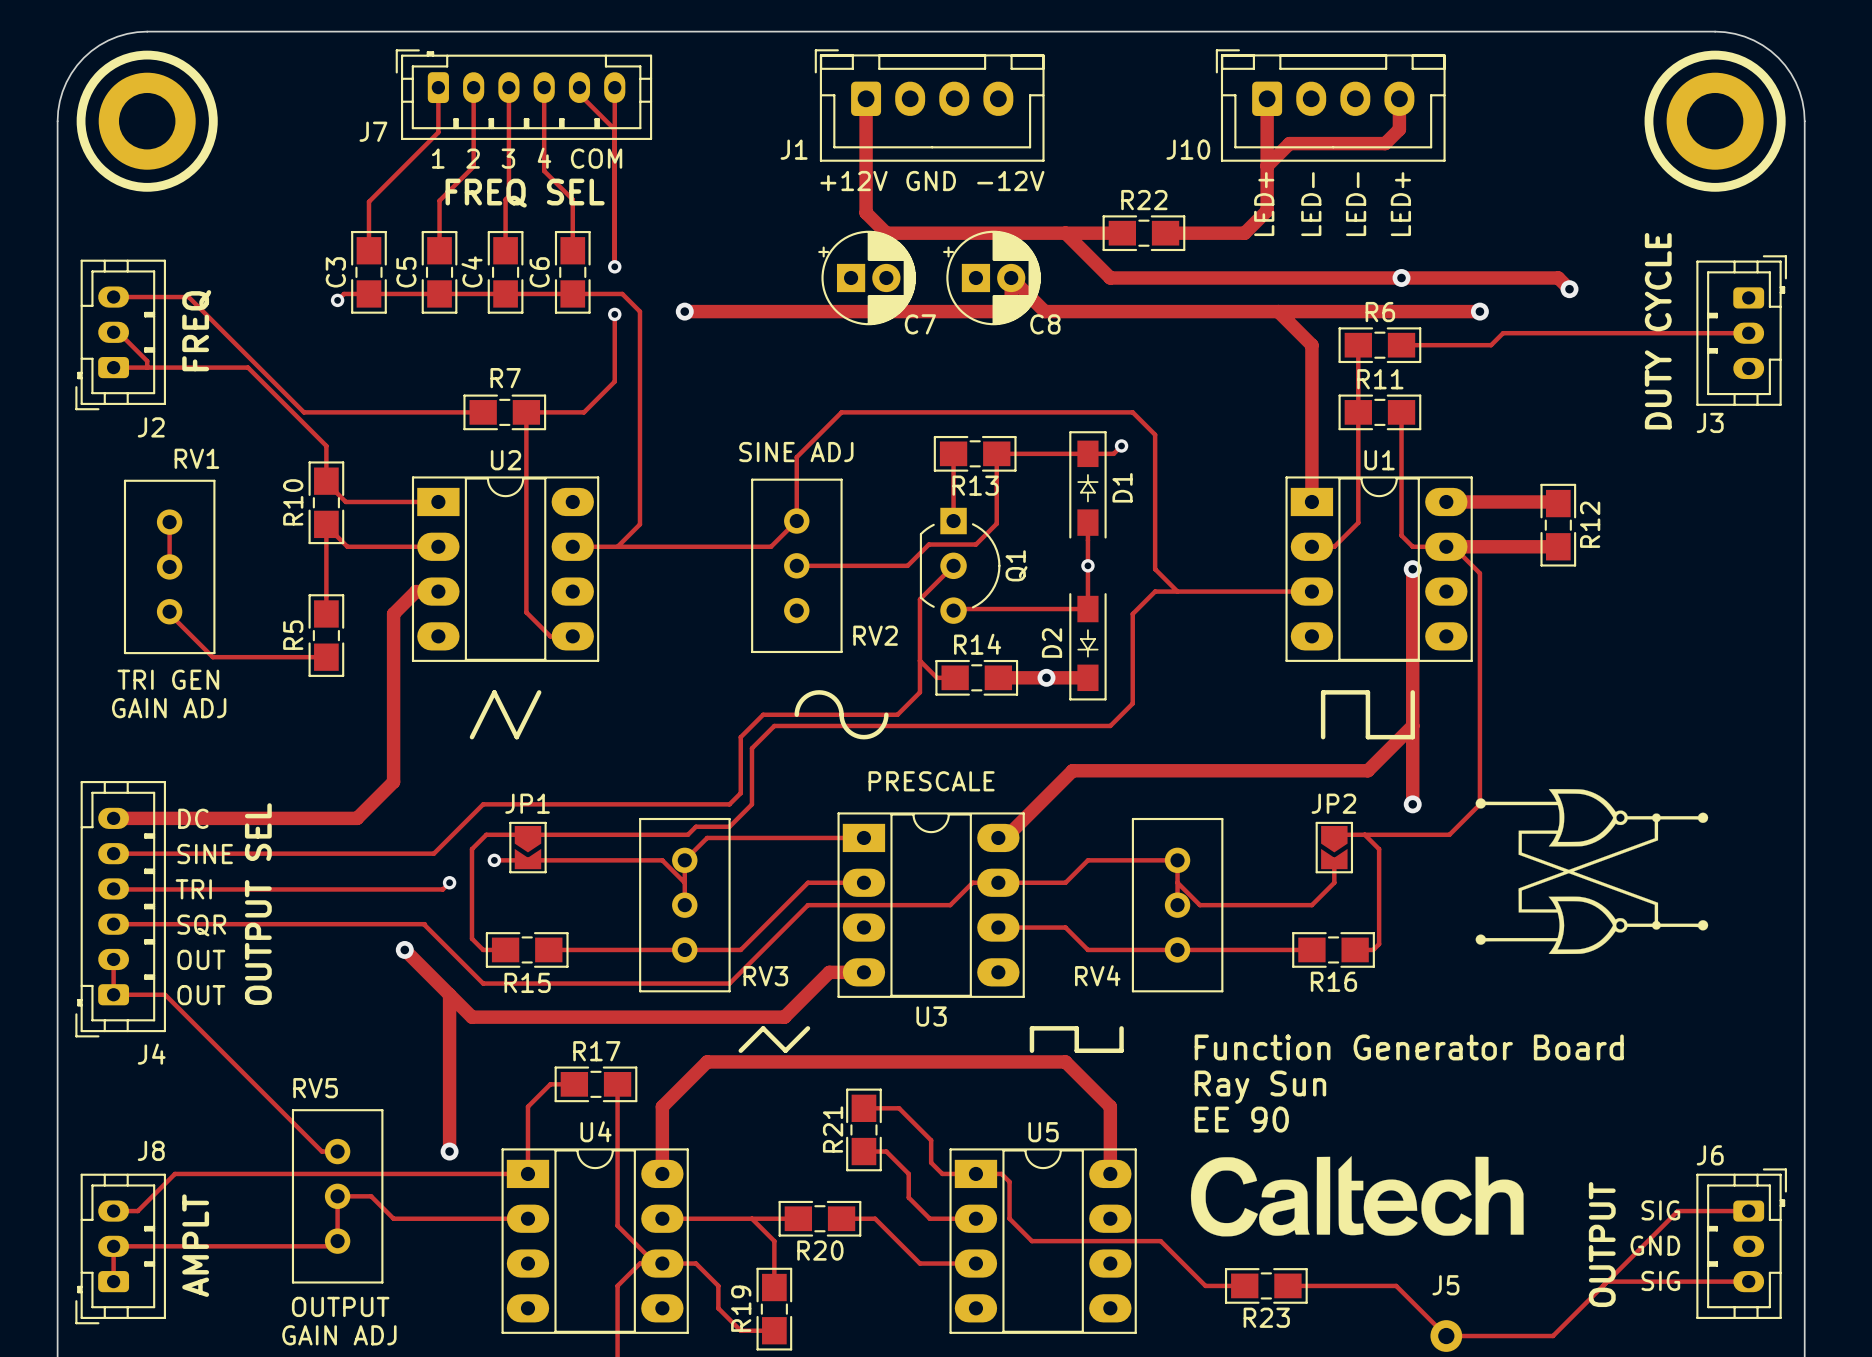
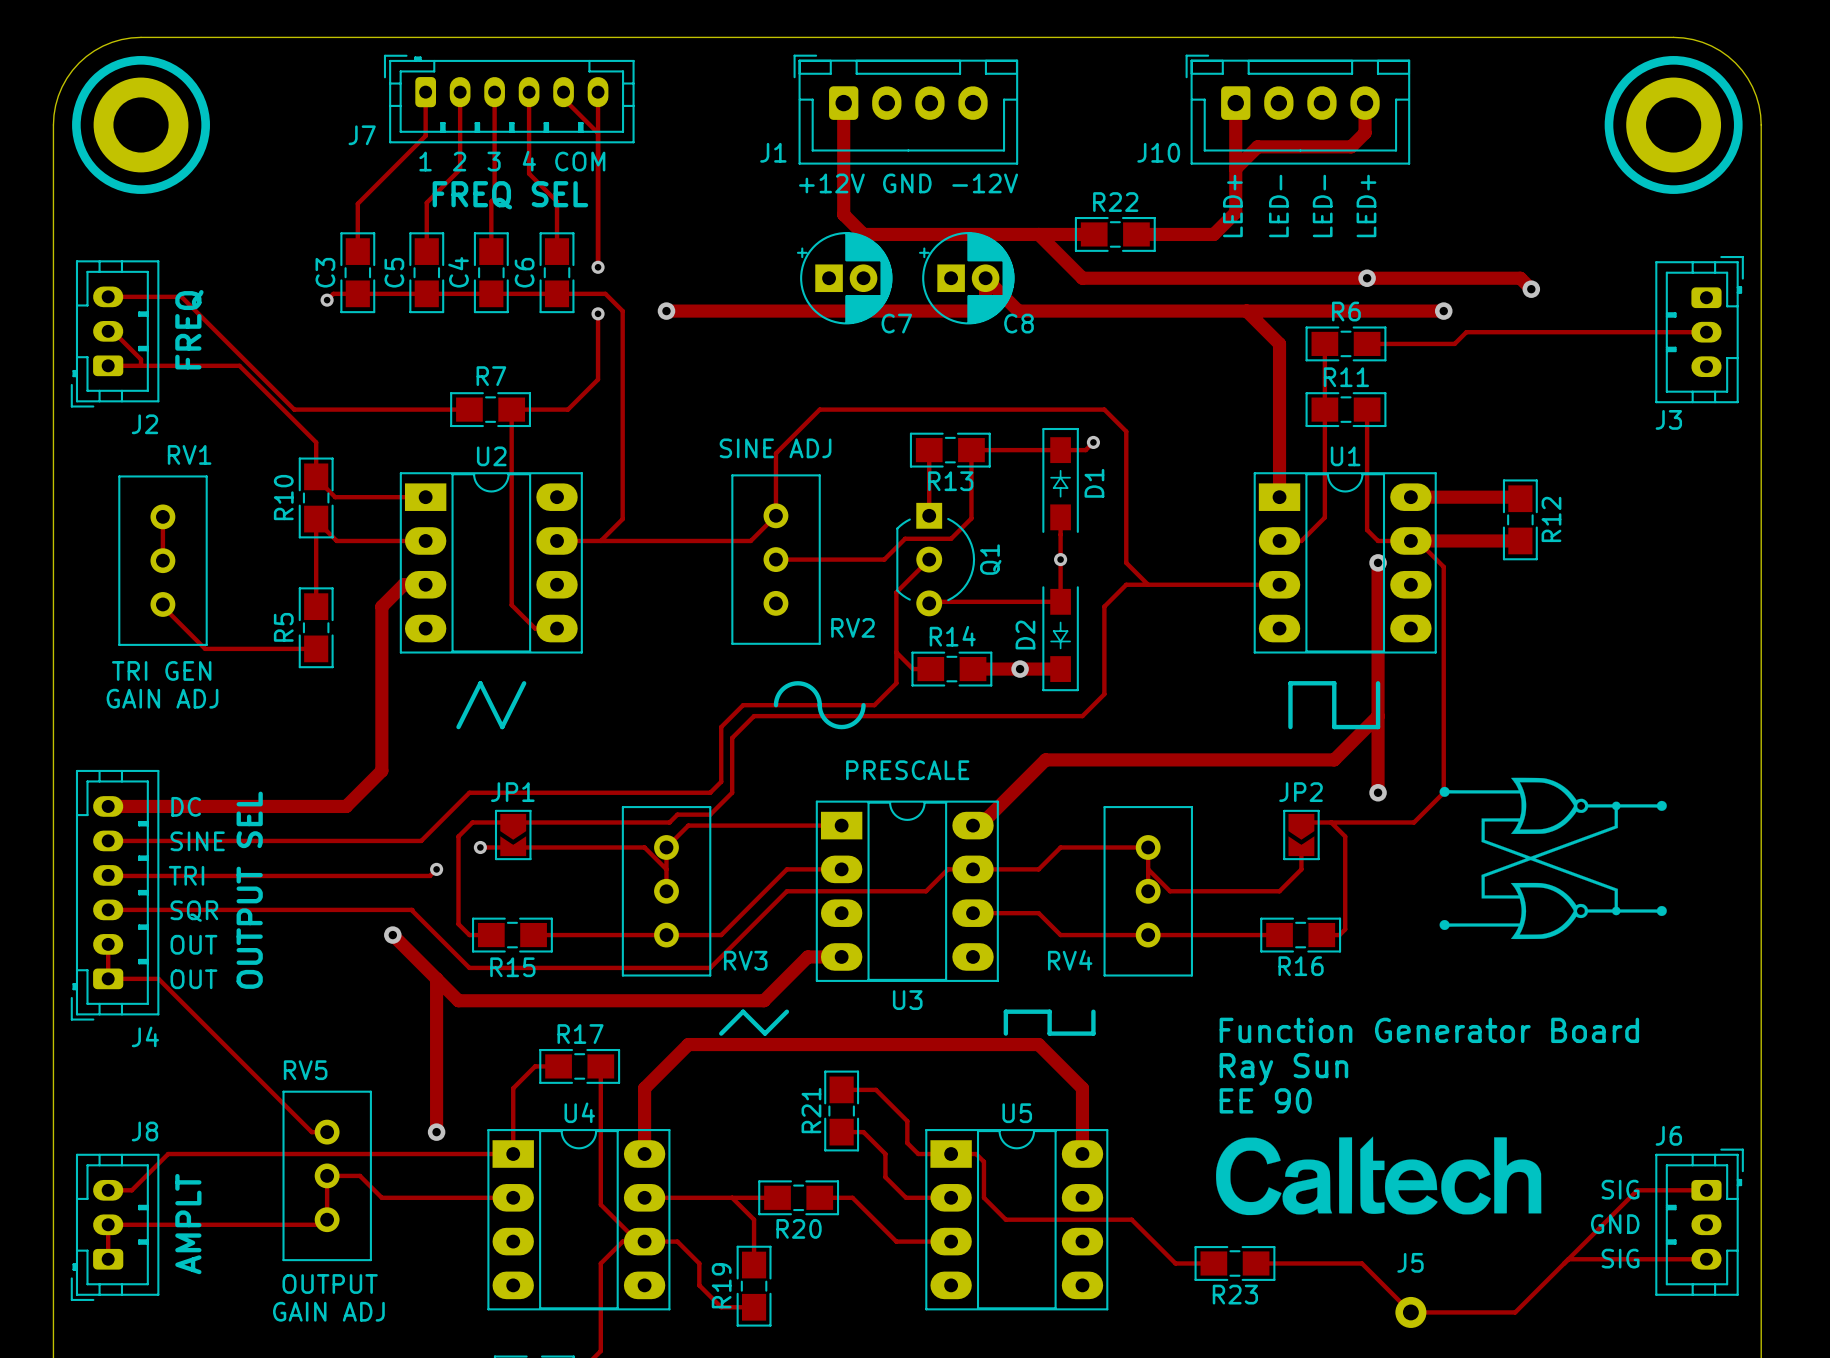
text: DUTY CYCLE (1658, 331) -> none
text position: Function Generator Board (1409, 1047) -> Function Generator Board (1429, 1030)
text position: Ray Sun (1260, 1087) -> Ray Sun (1283, 1069)
text position: EE 90 (1241, 1119) -> EE 90 (1265, 1100)
drawing position: (1357, 1196) -> (1378, 1175)
text: OUTPUT (1602, 1244) -> none

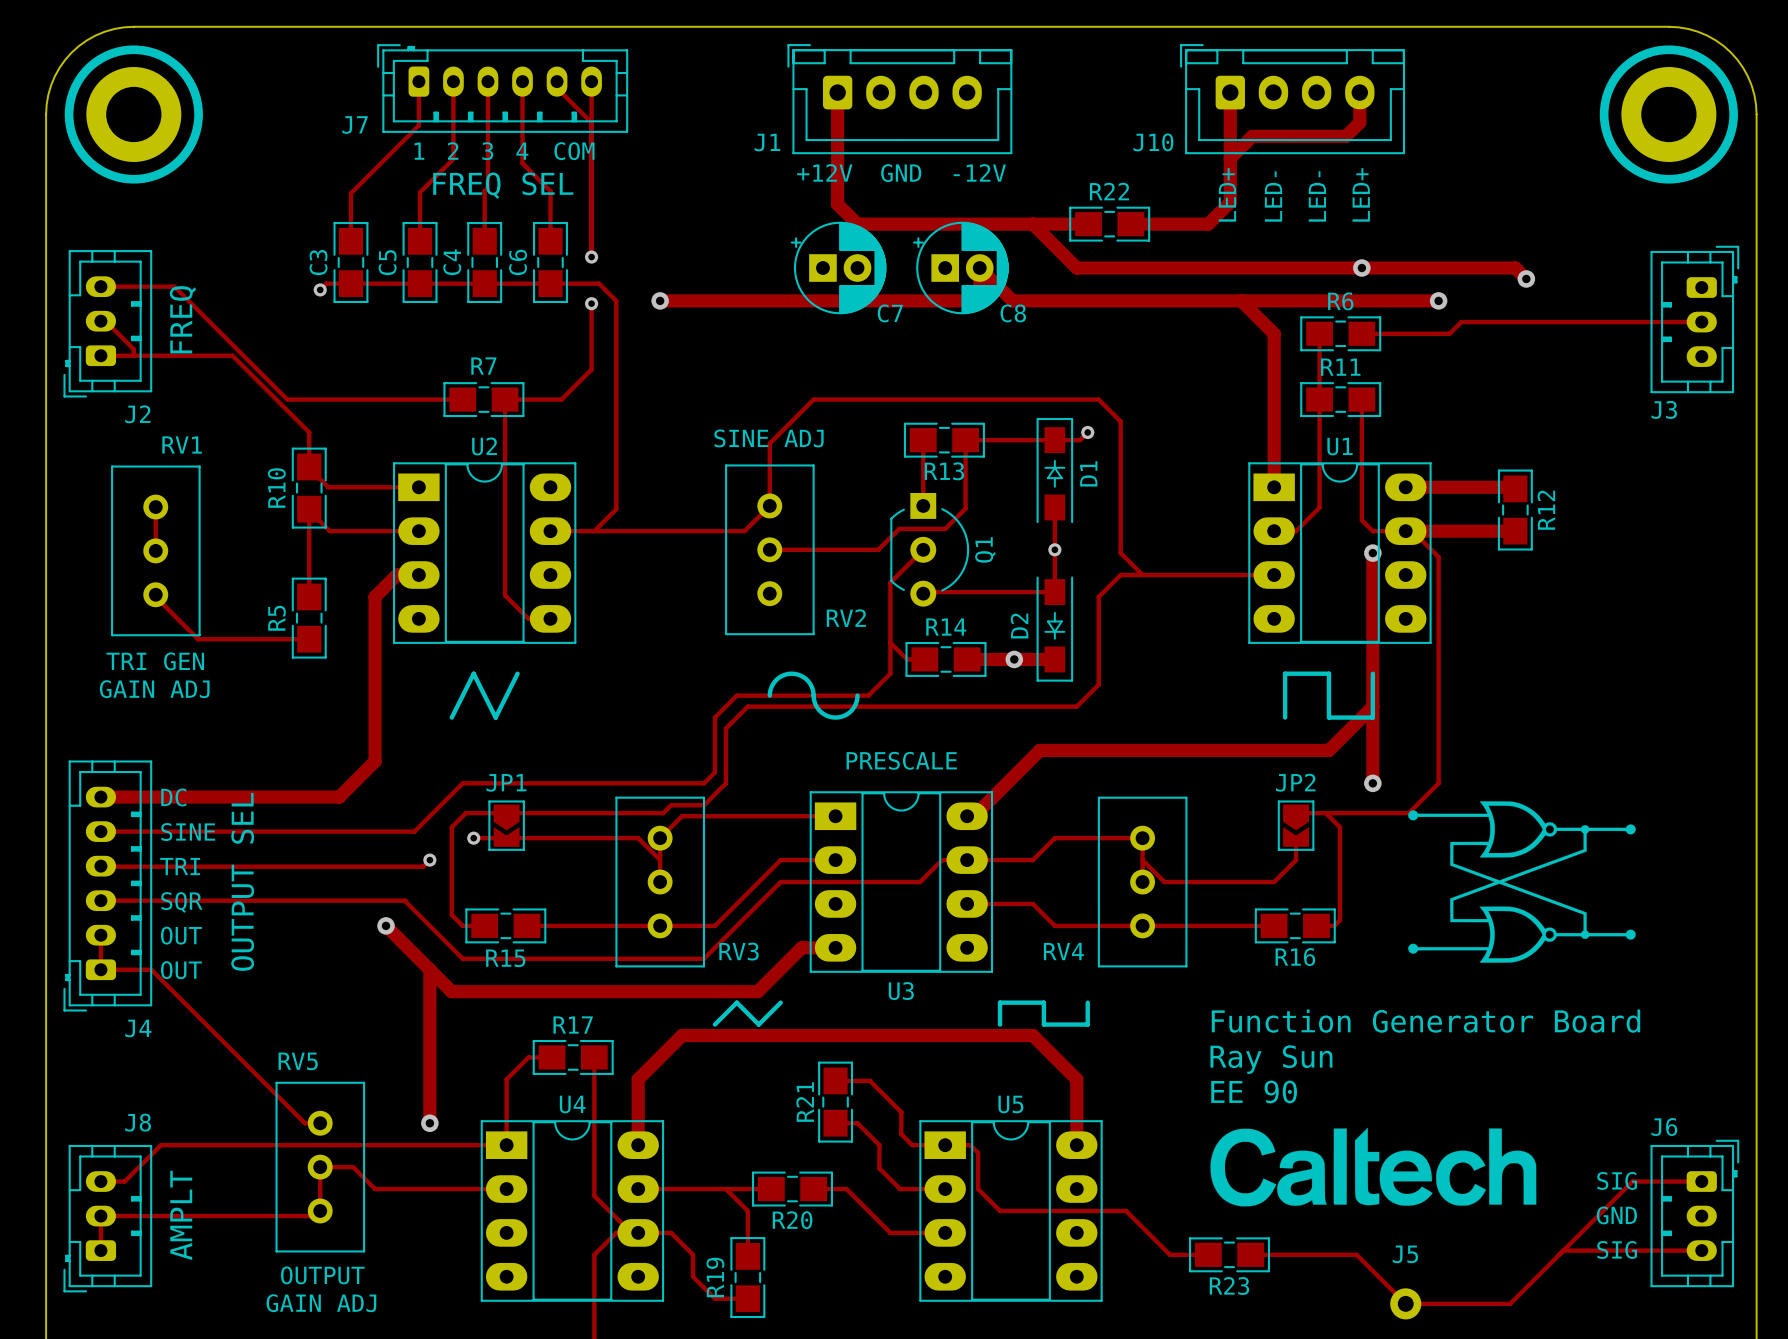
drawing position: (1553, 858) -> (1521, 882)

